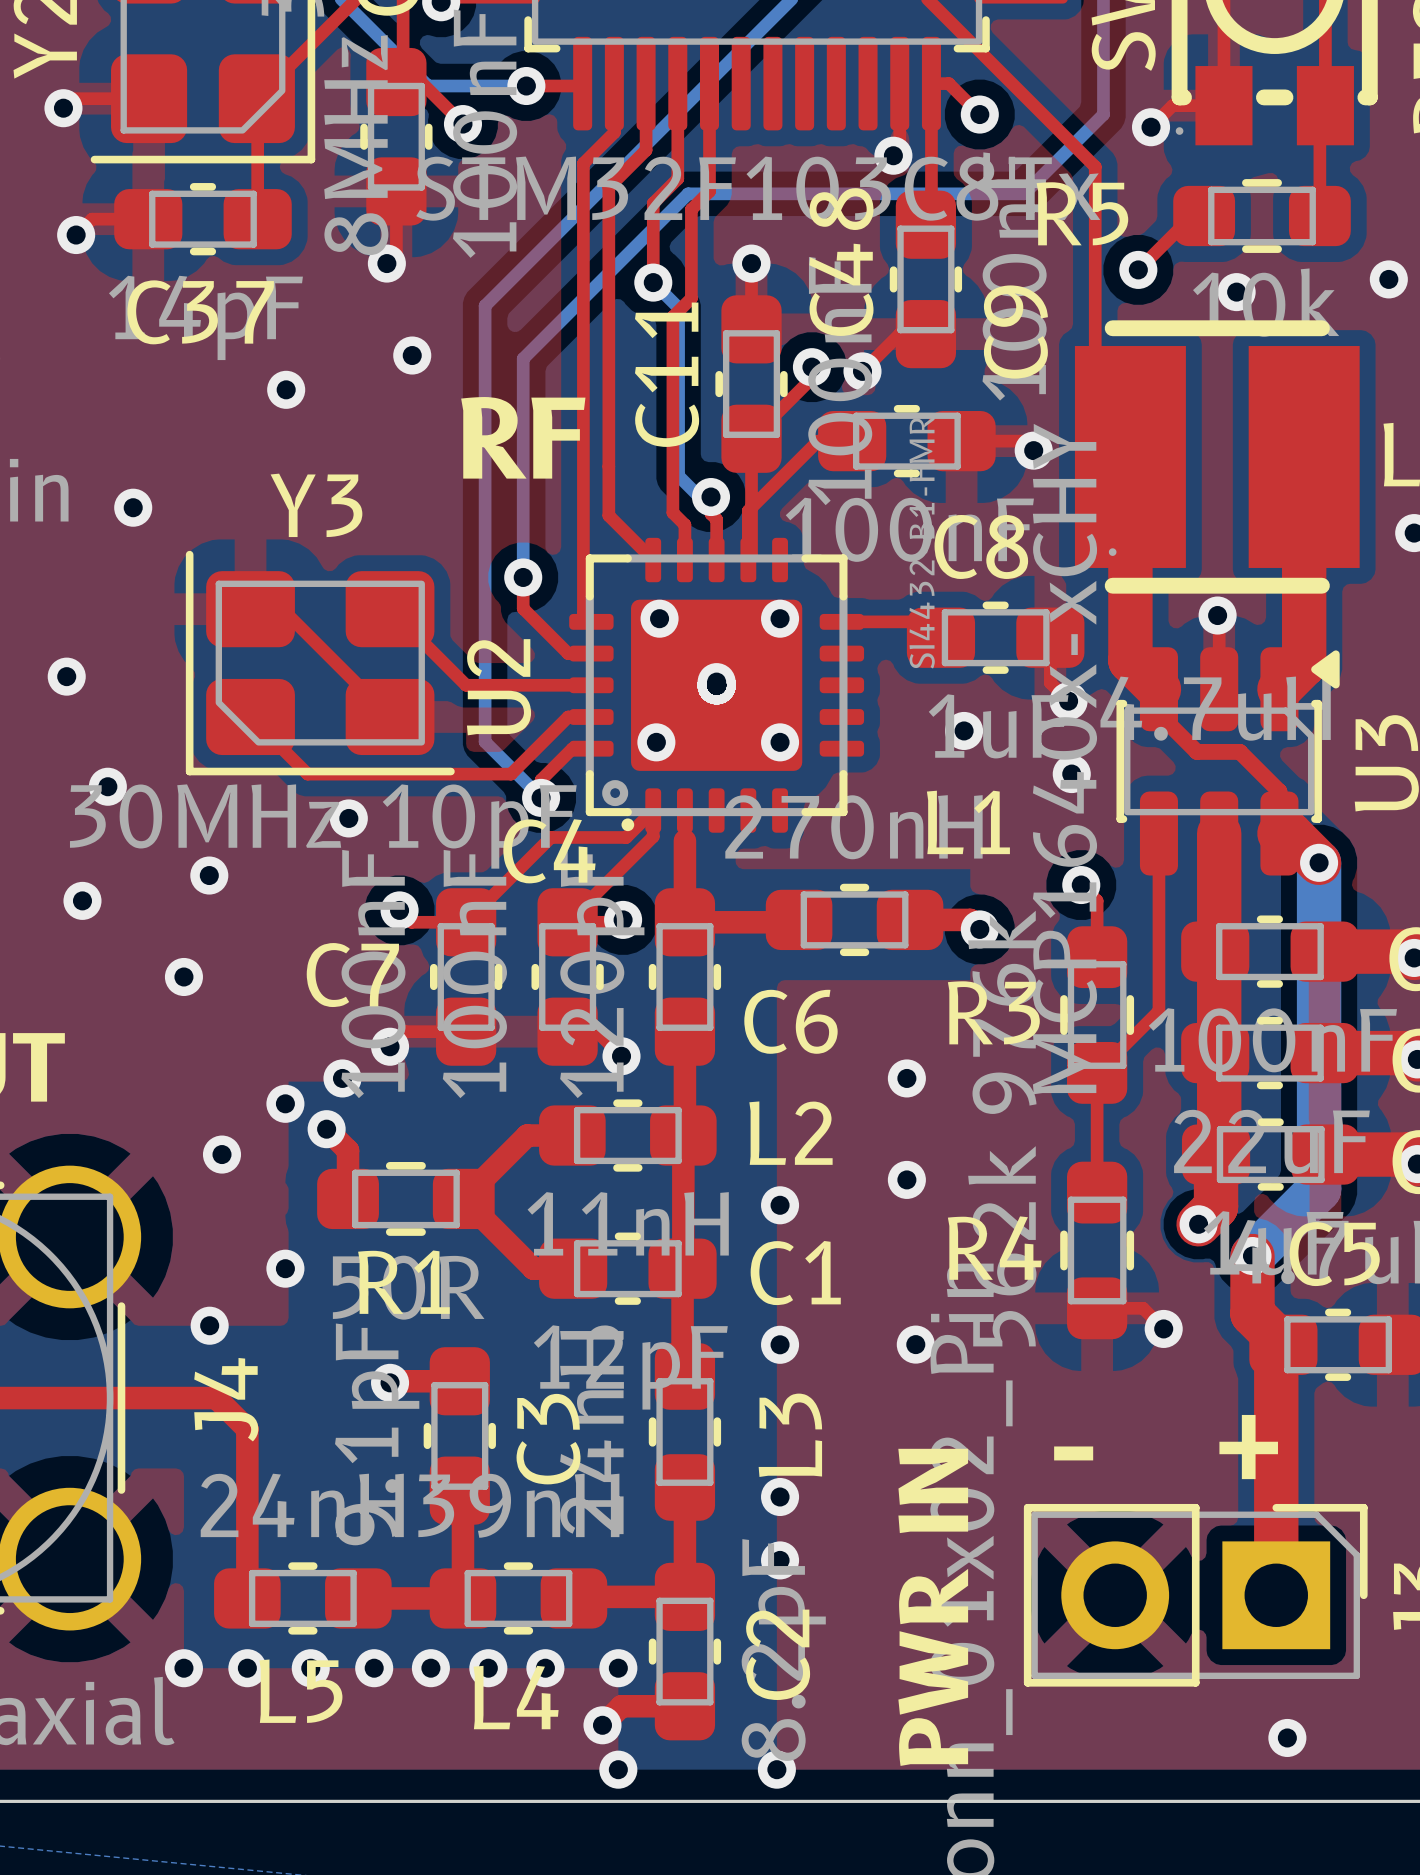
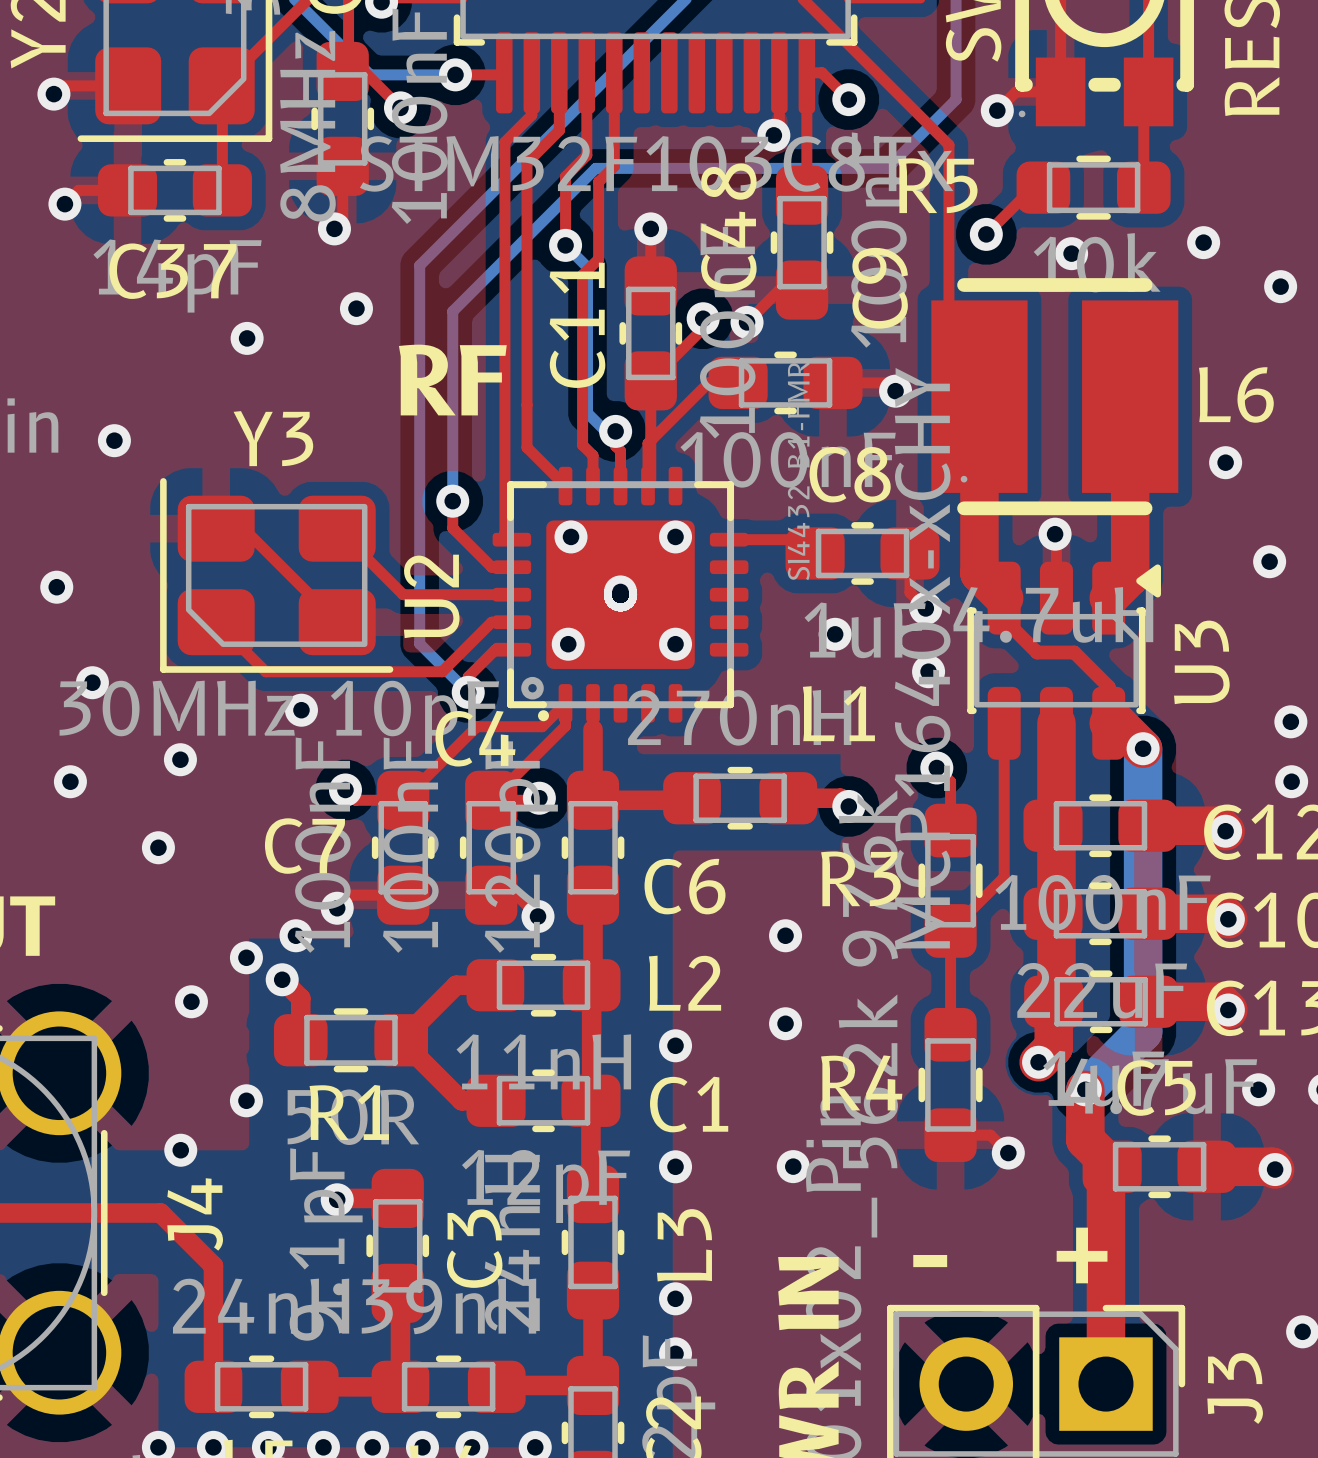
top track: (186, 1398) (216, 1398) (247, 1429) (247, 1458) -> (160, 1213) (213, 1265)

